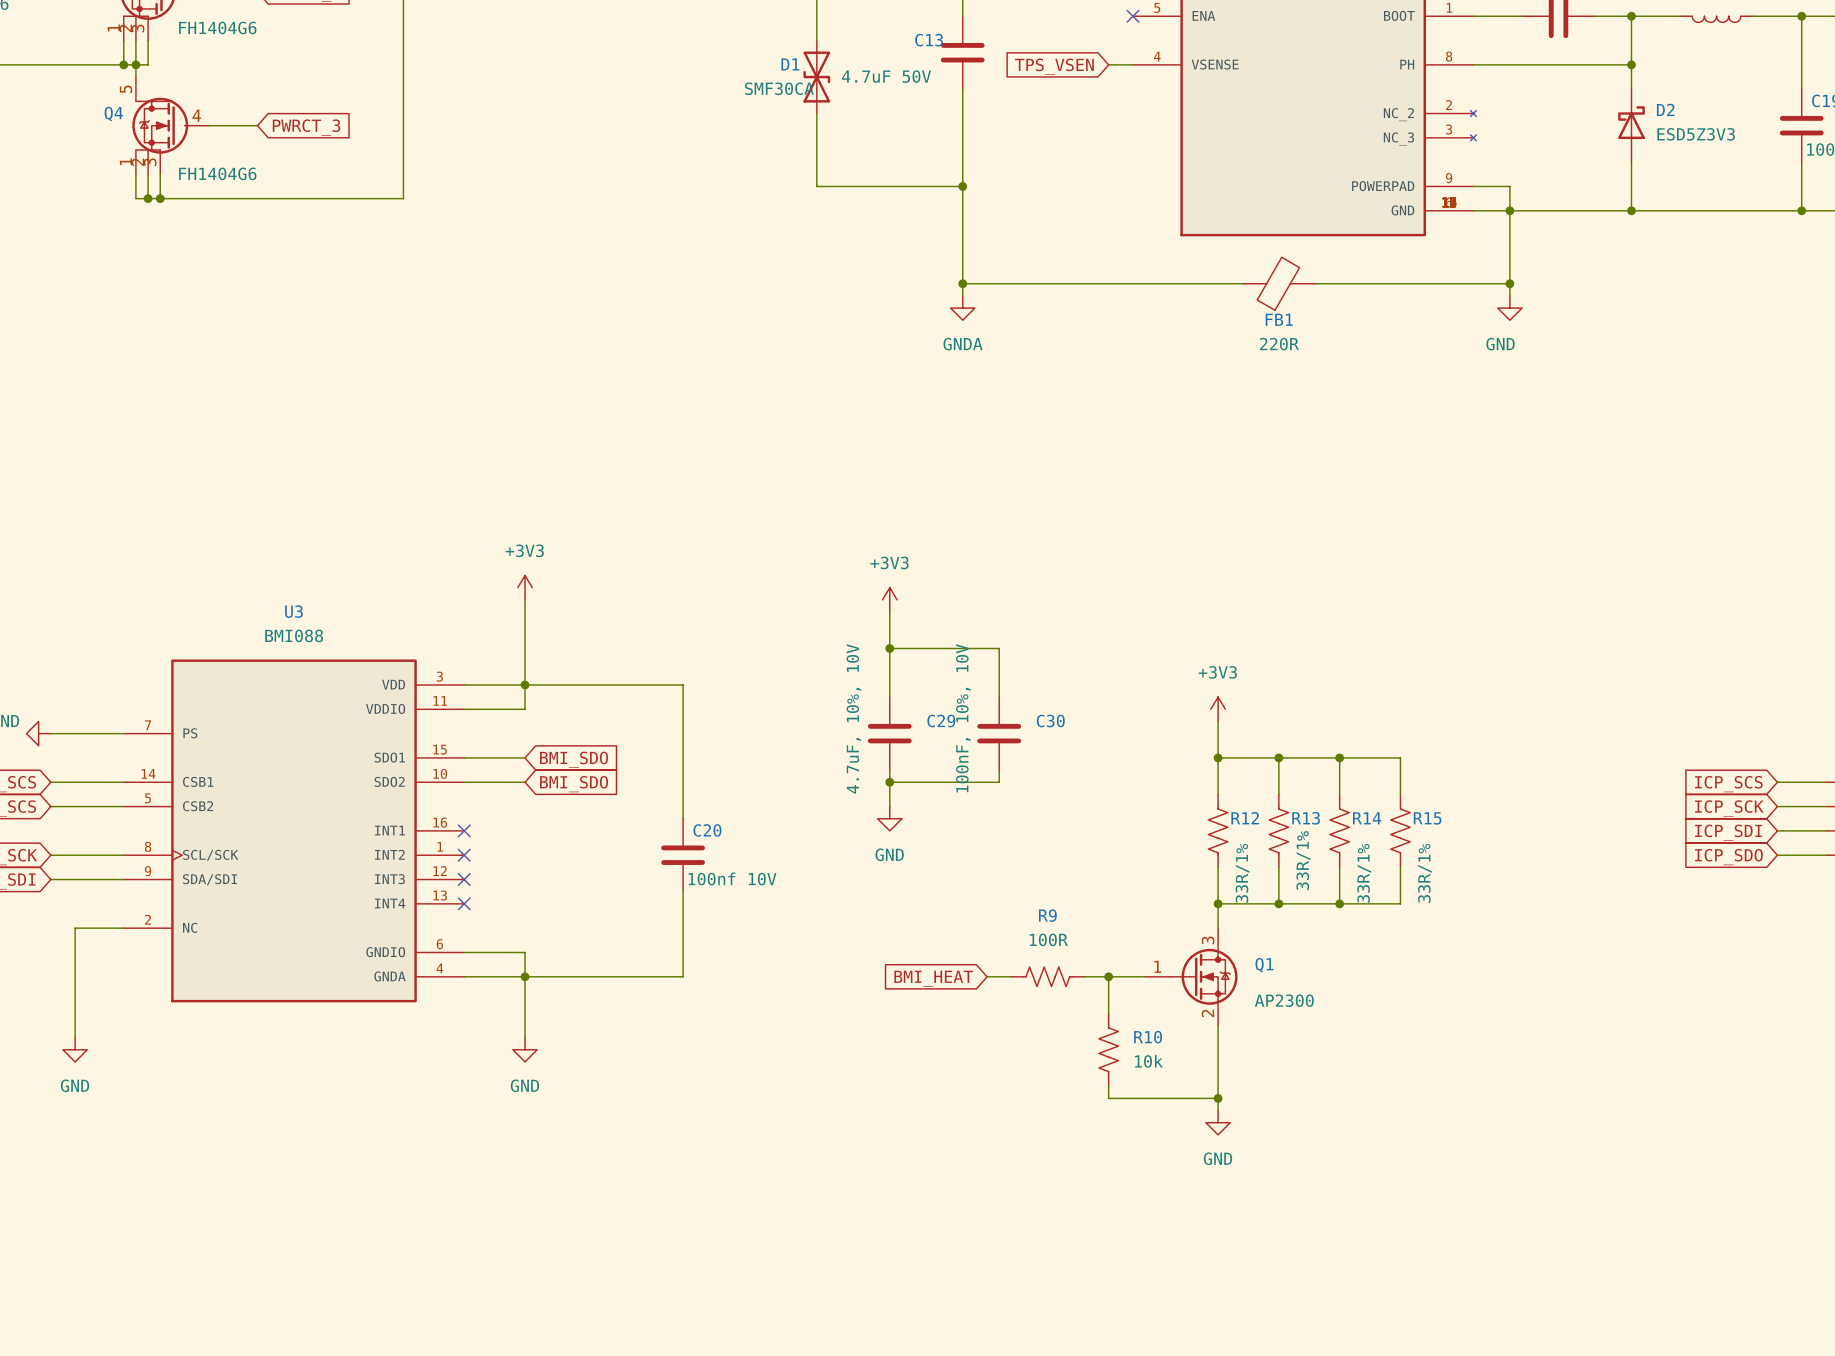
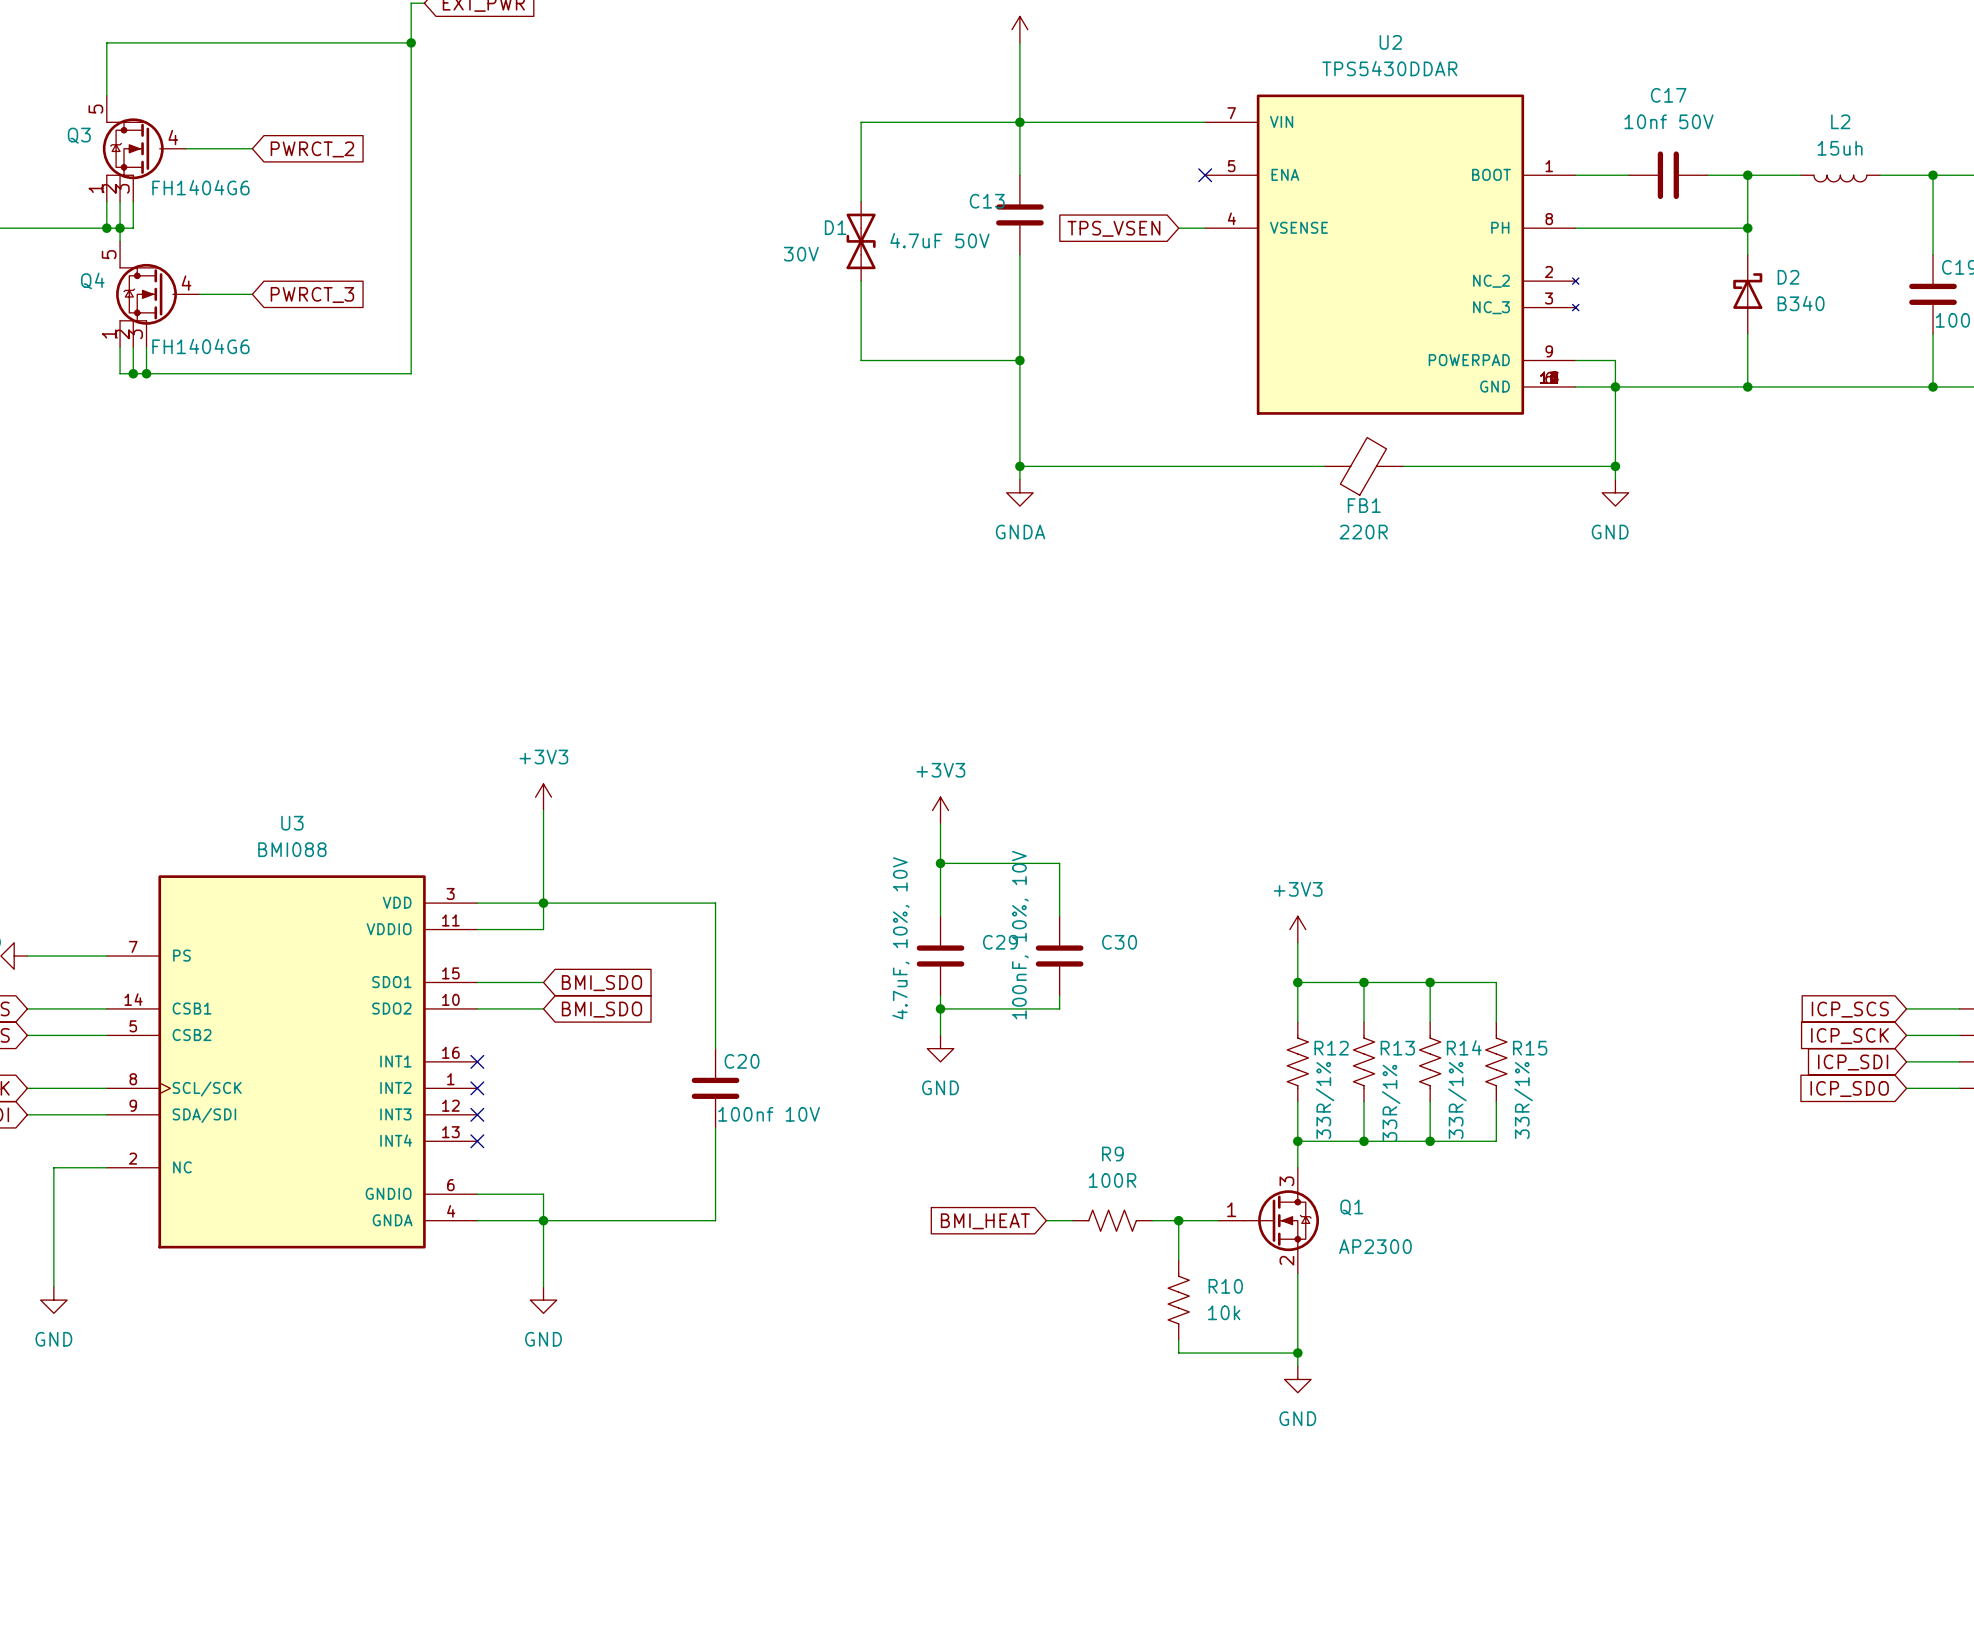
D1 value: SMF30CA (779, 88) -> 30V (801, 254)
D2 value: ESD5Z3V3 (1696, 134) -> B340 (1801, 303)

